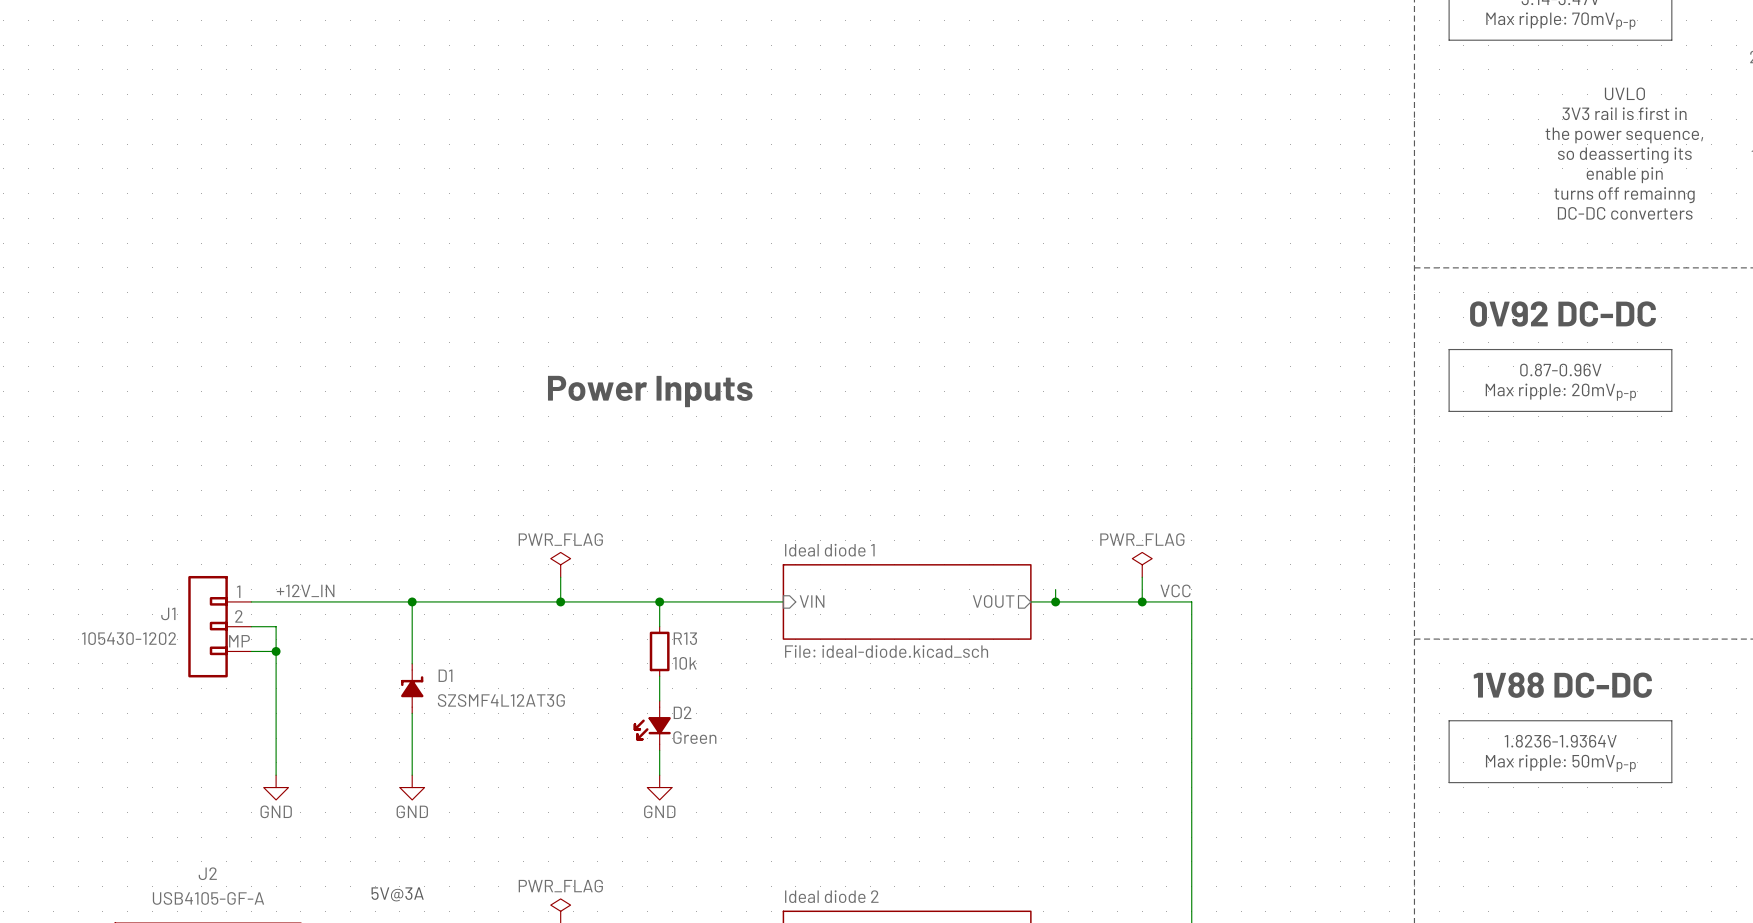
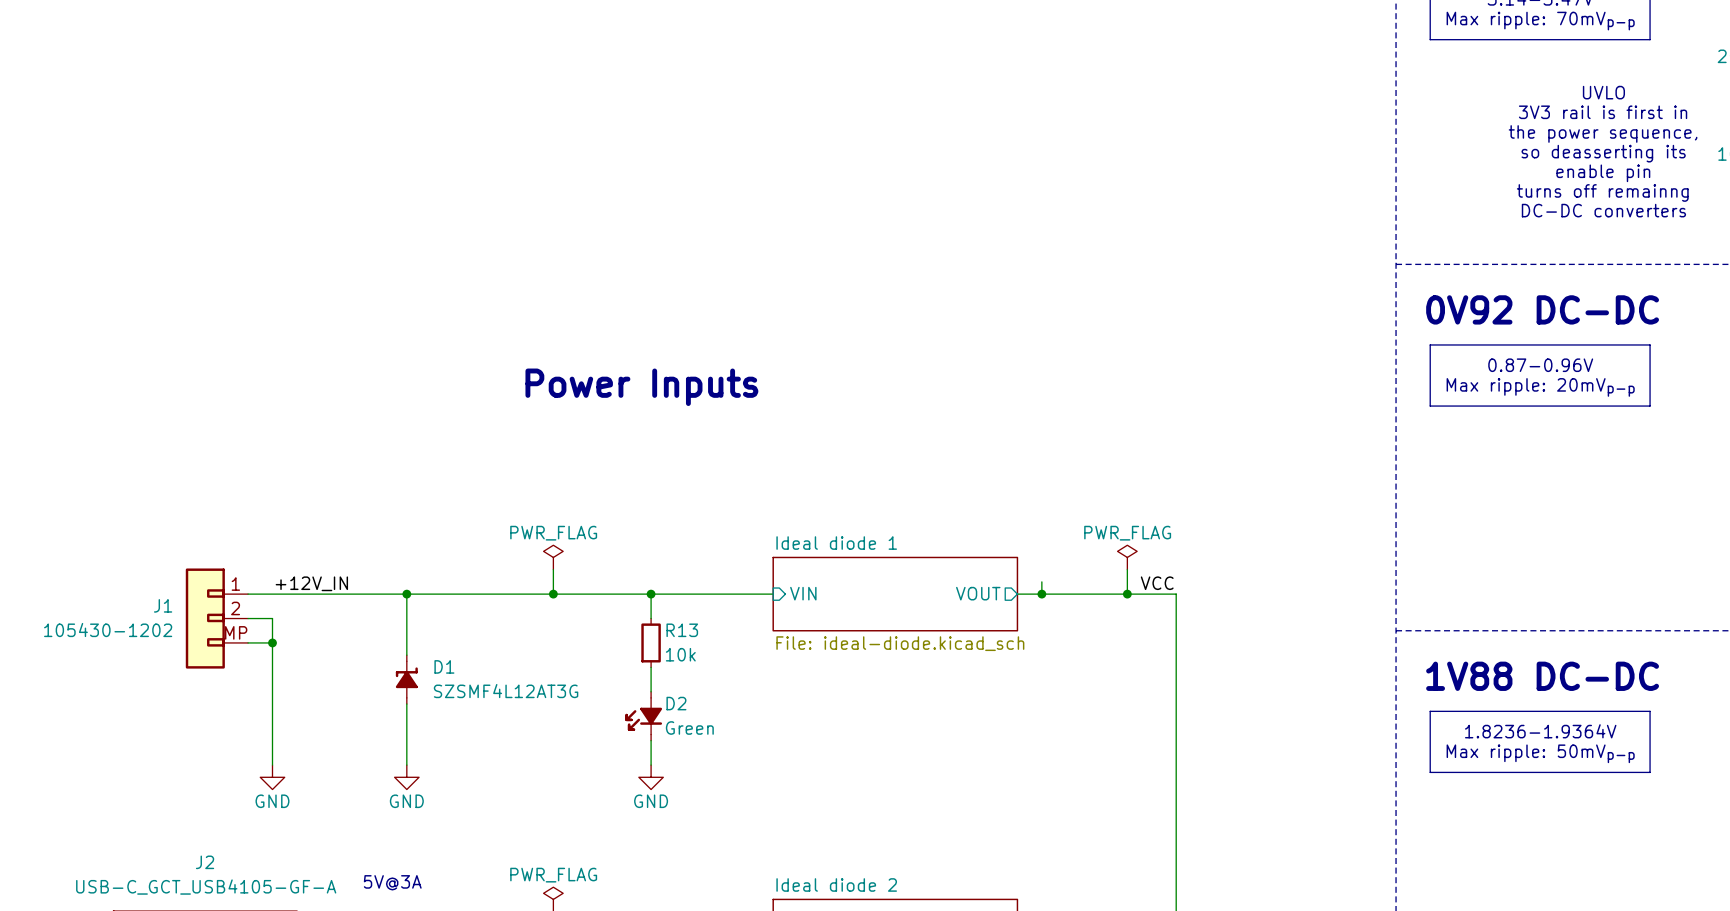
J2 text: USB4105-GF-A (208, 898) -> none
J2 value: none -> USB-C_GCT_USB4105-GF-A (206, 887)

